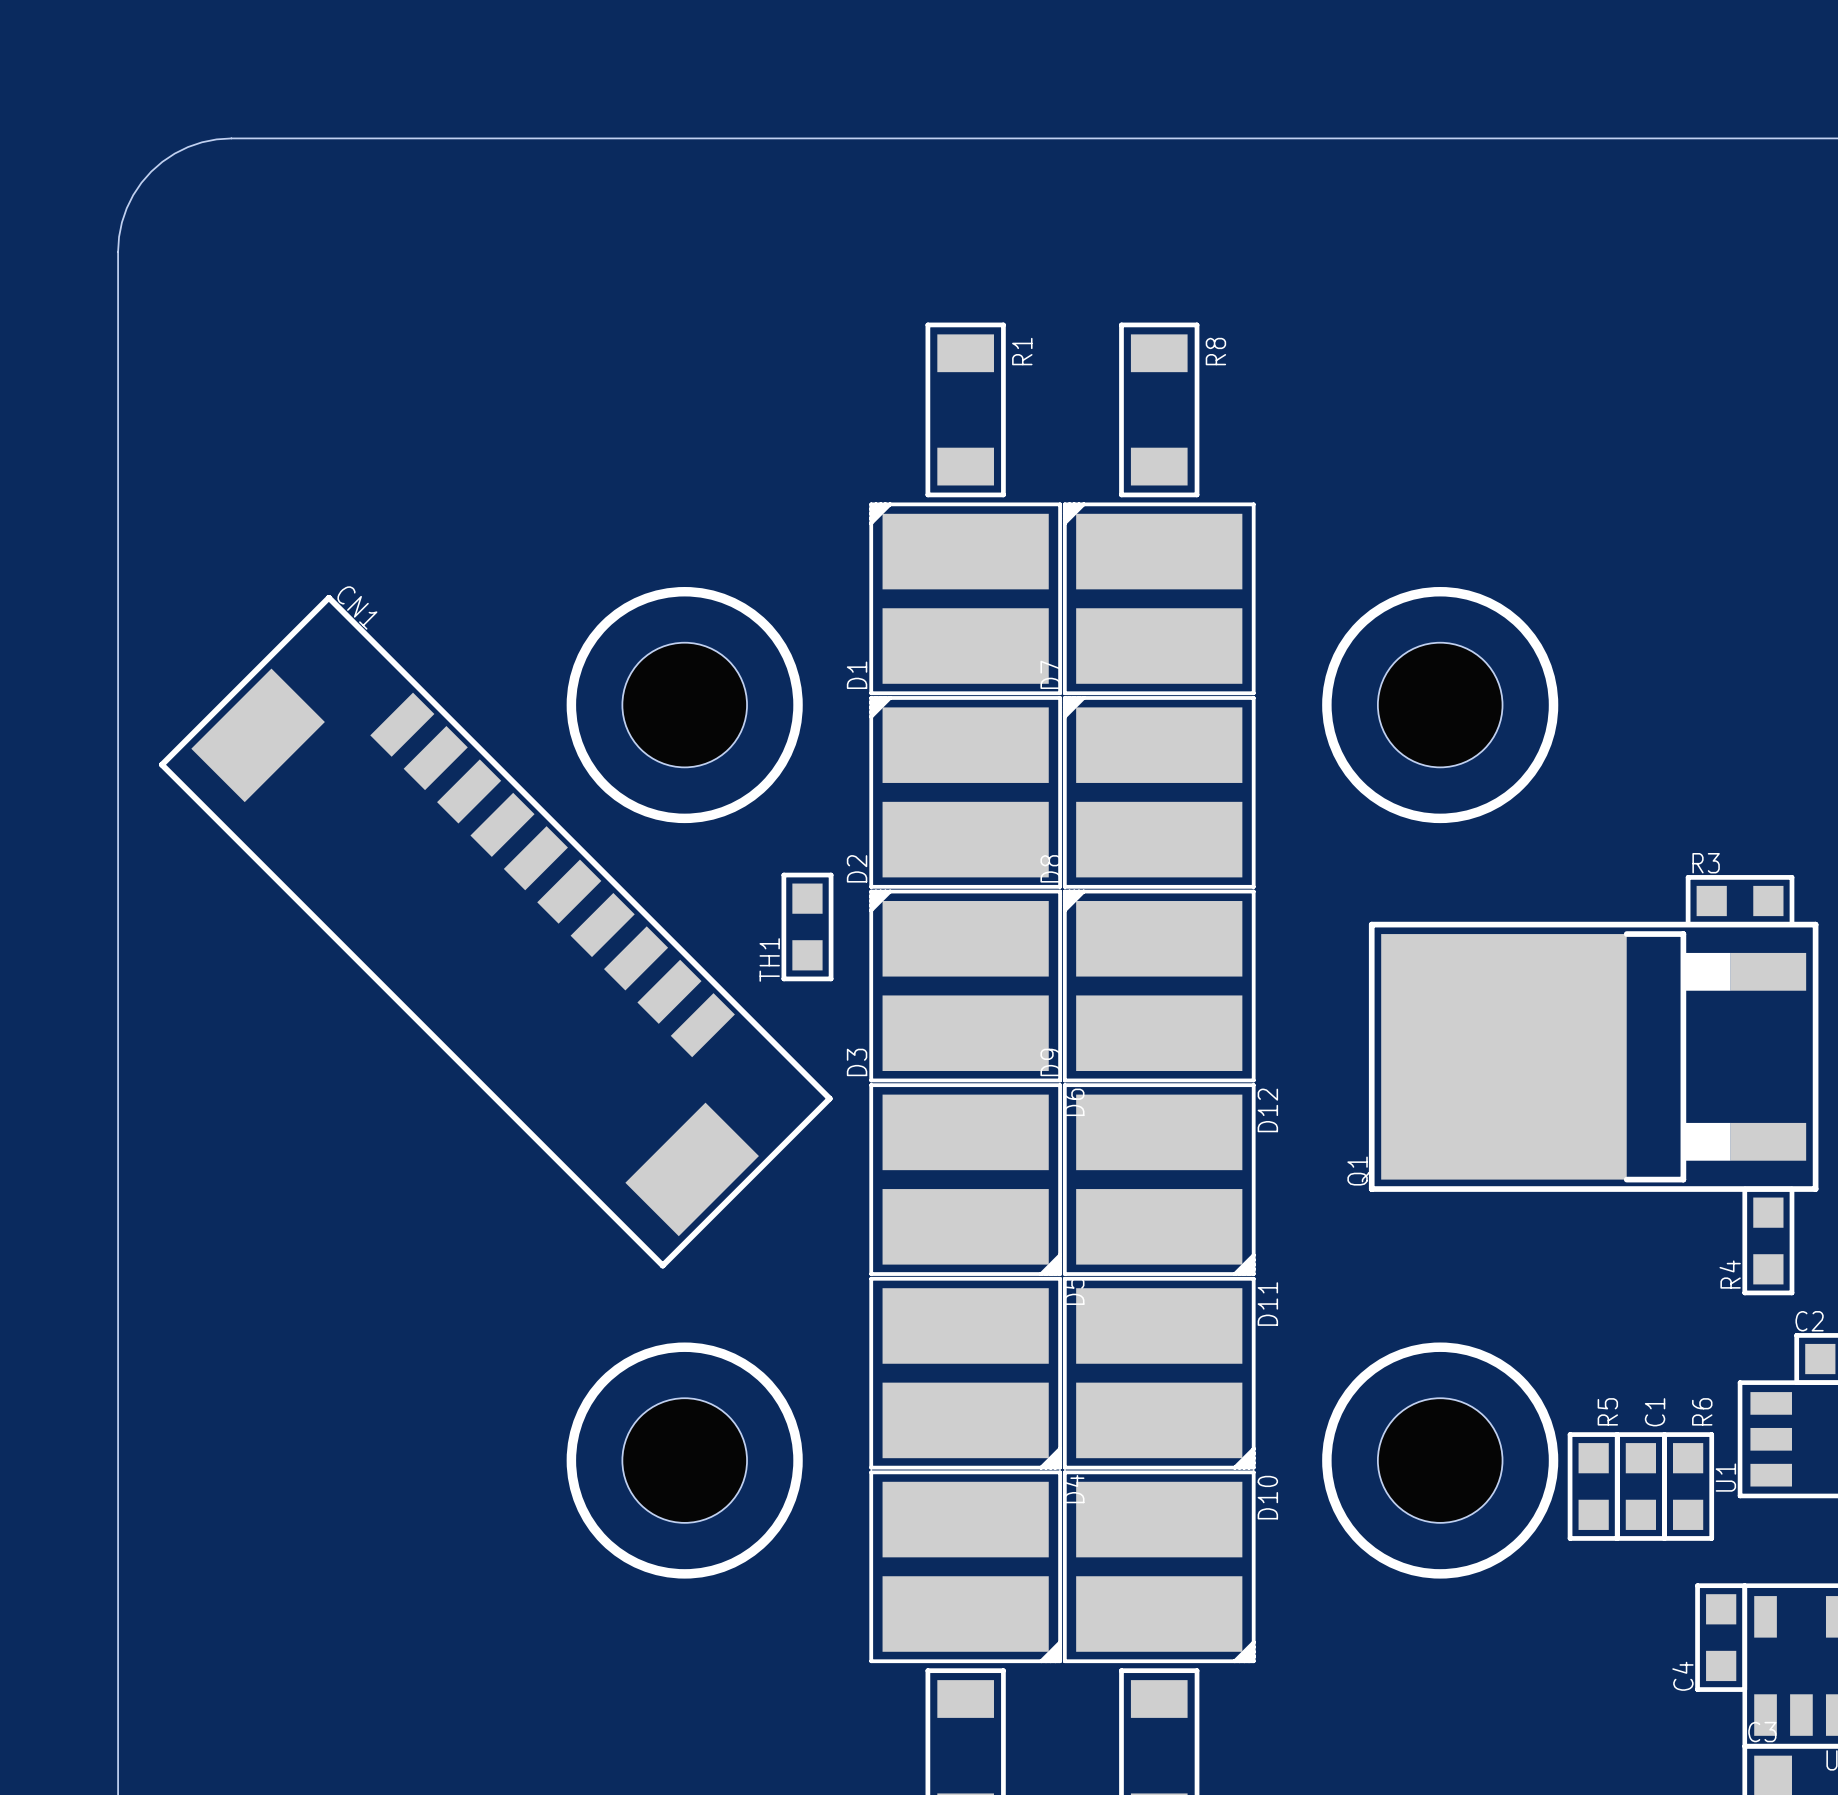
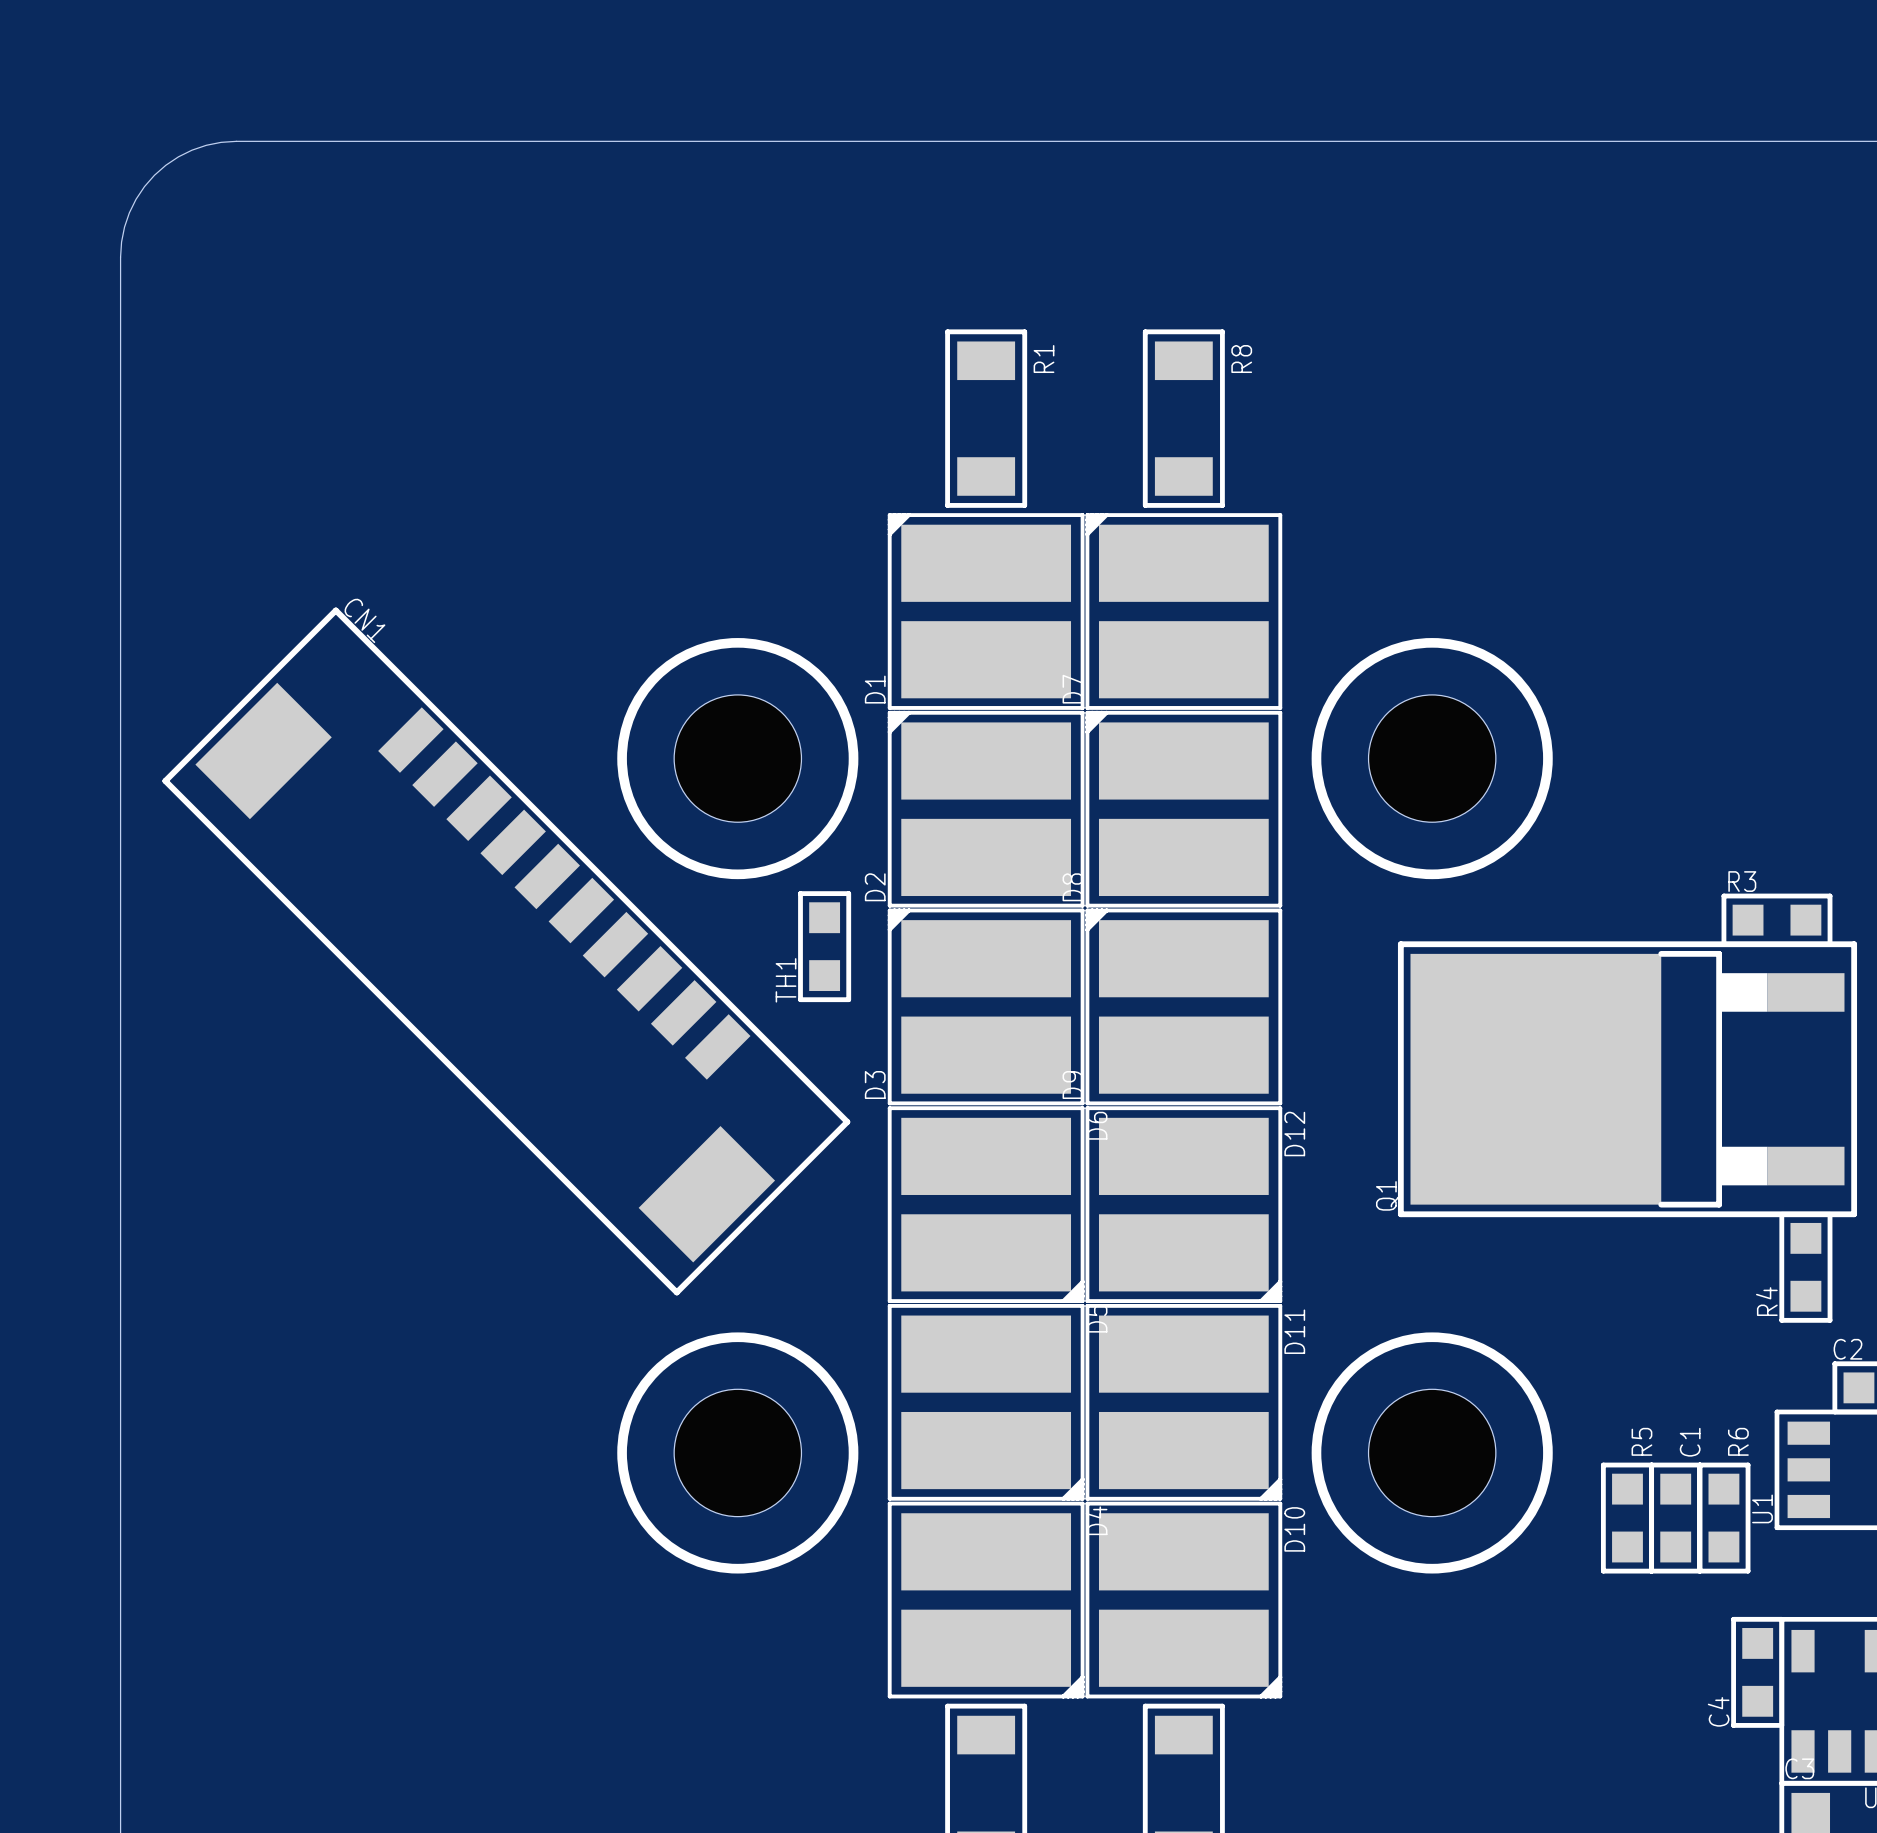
part position: (684, 705) -> (737, 758)
part position: (1440, 705) -> (1432, 758)
part position: (684, 1460) -> (737, 1452)
part position: (1440, 1460) -> (1432, 1452)

